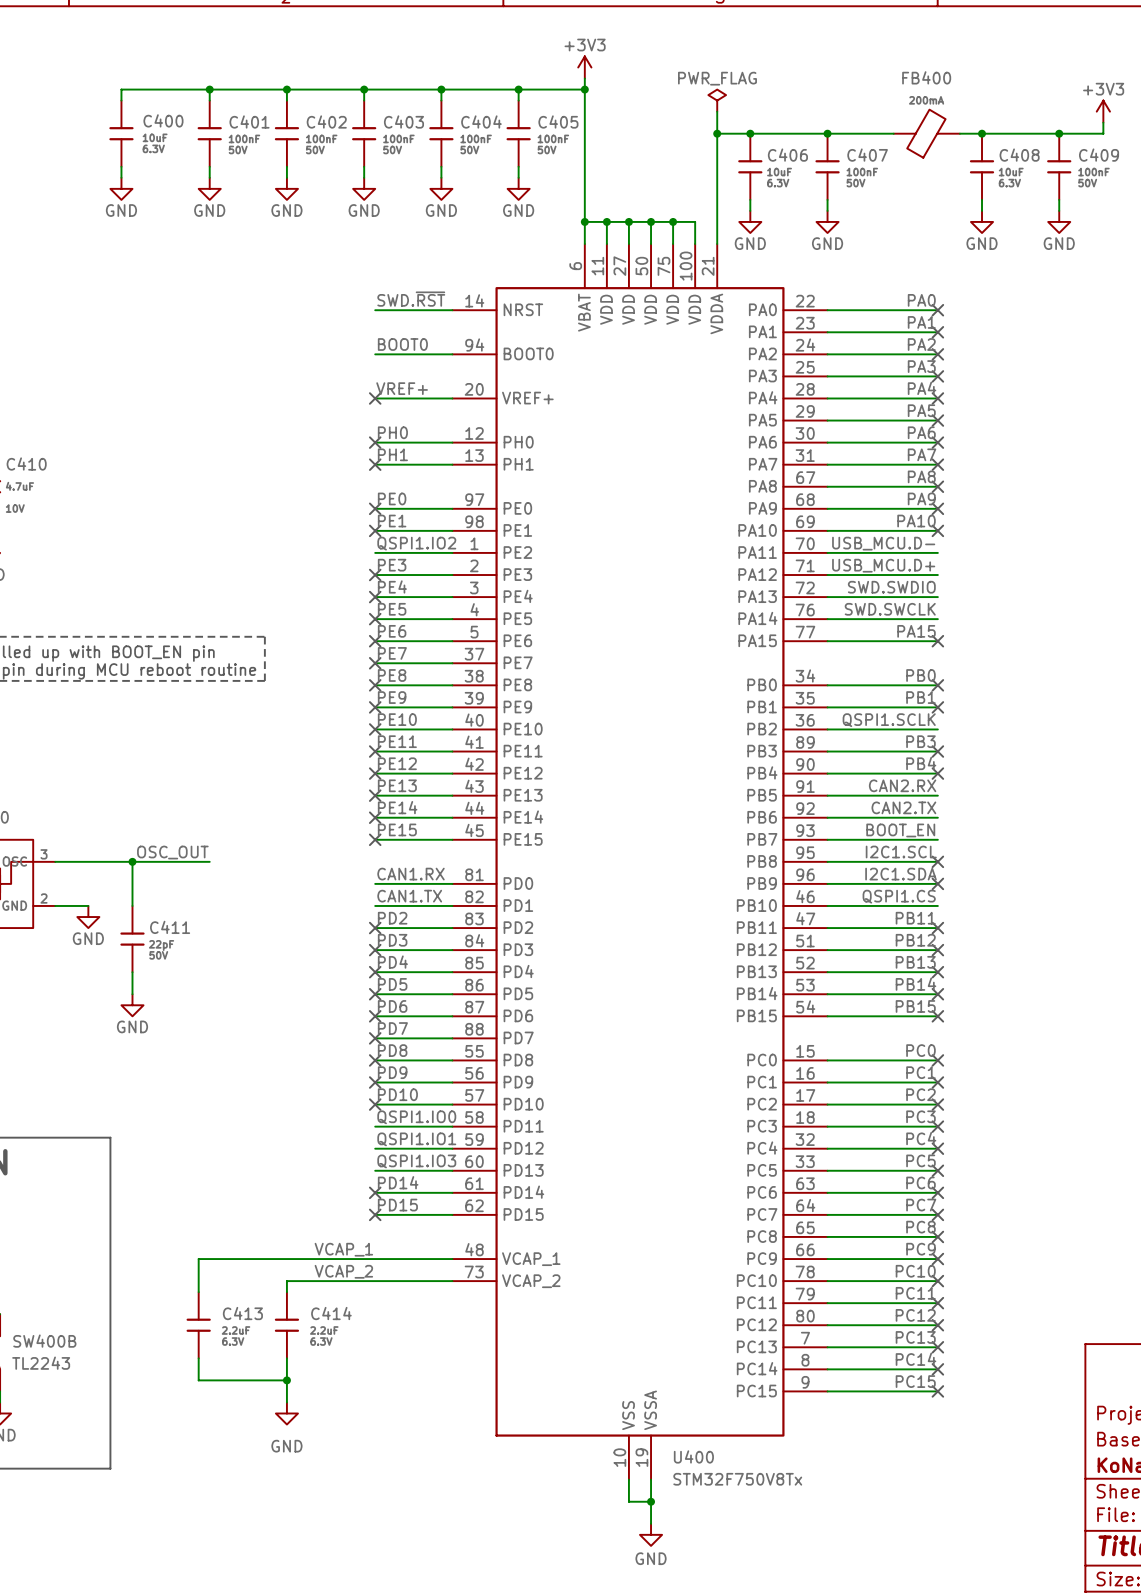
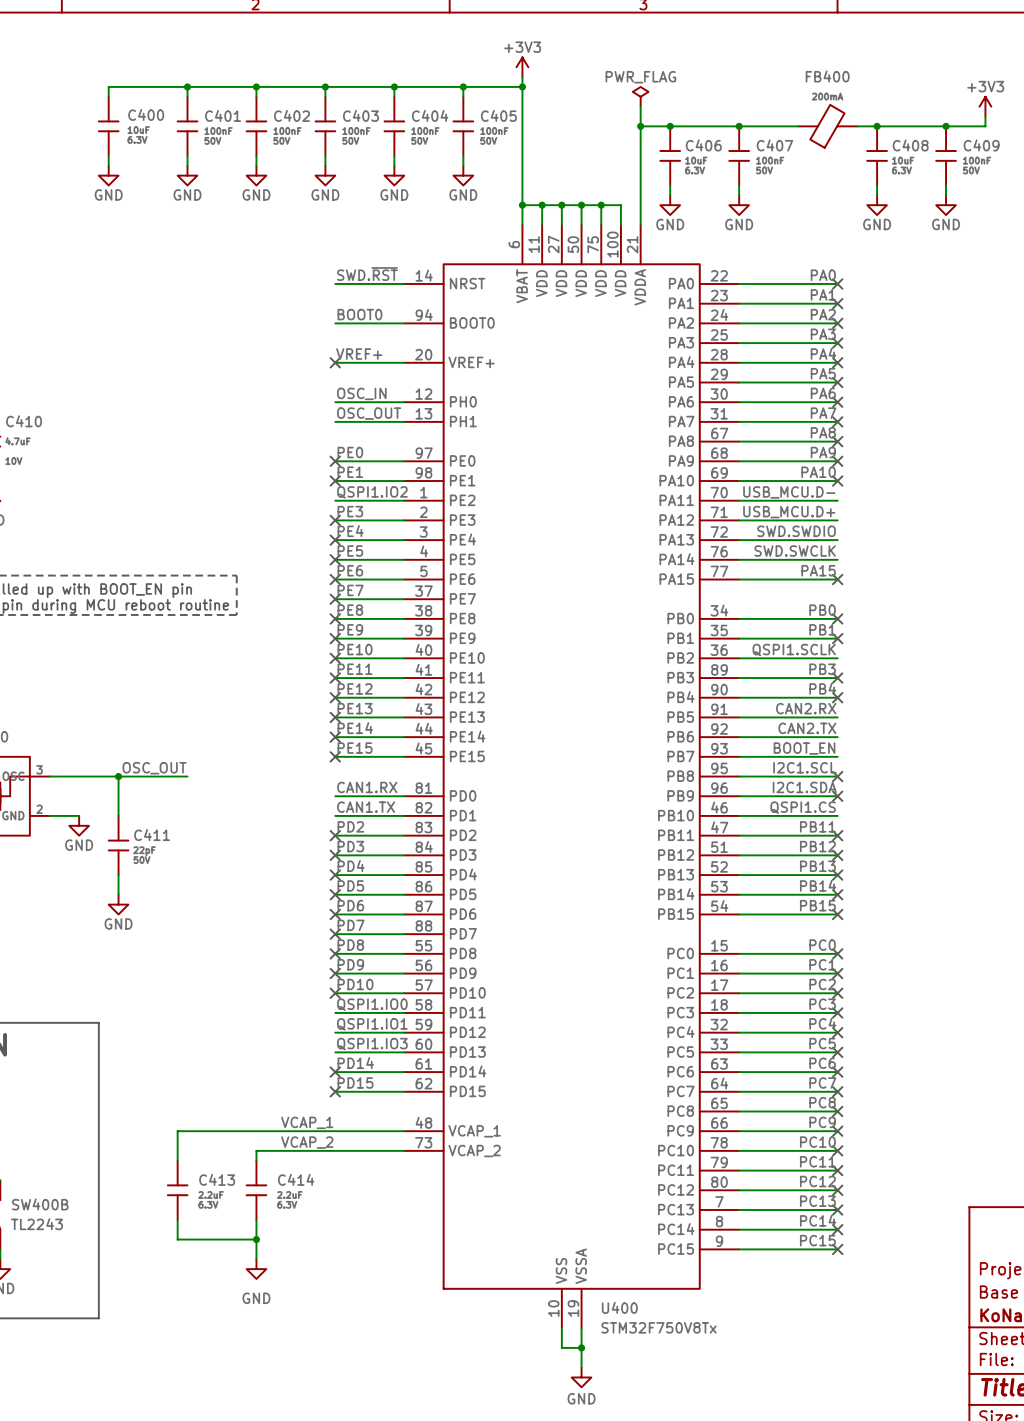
label: PH0 (392, 432) -> OSC_IN (361, 393)
no-connect mark: (375, 442) -> none
label: PH1 (392, 454) -> OSC_OUT (369, 413)
no-connect mark: (375, 464) -> none

